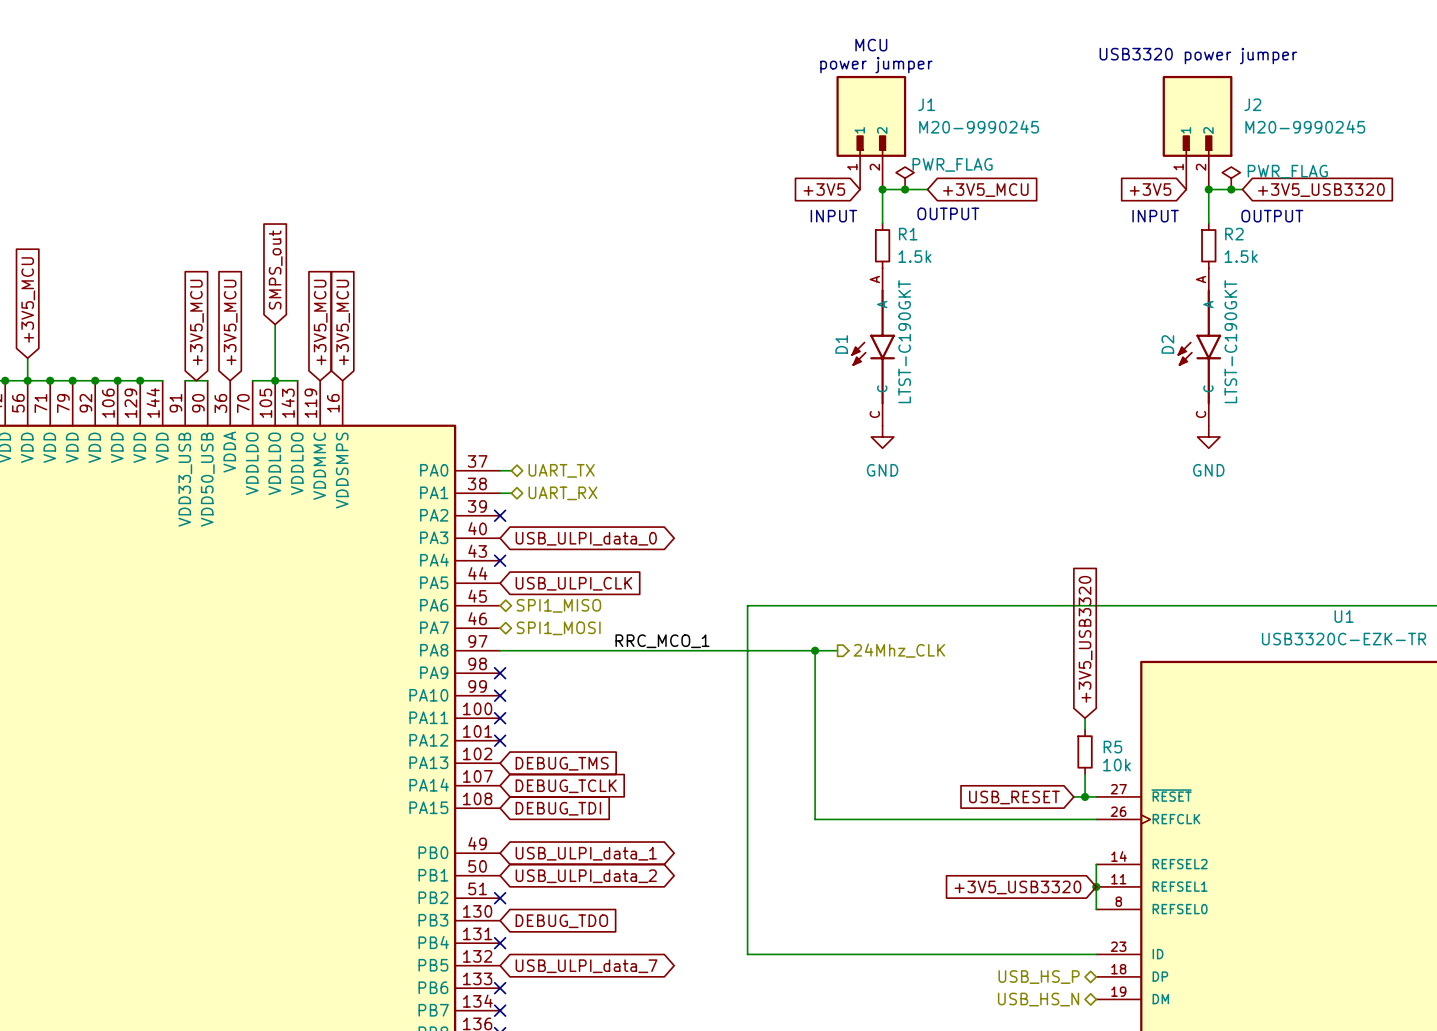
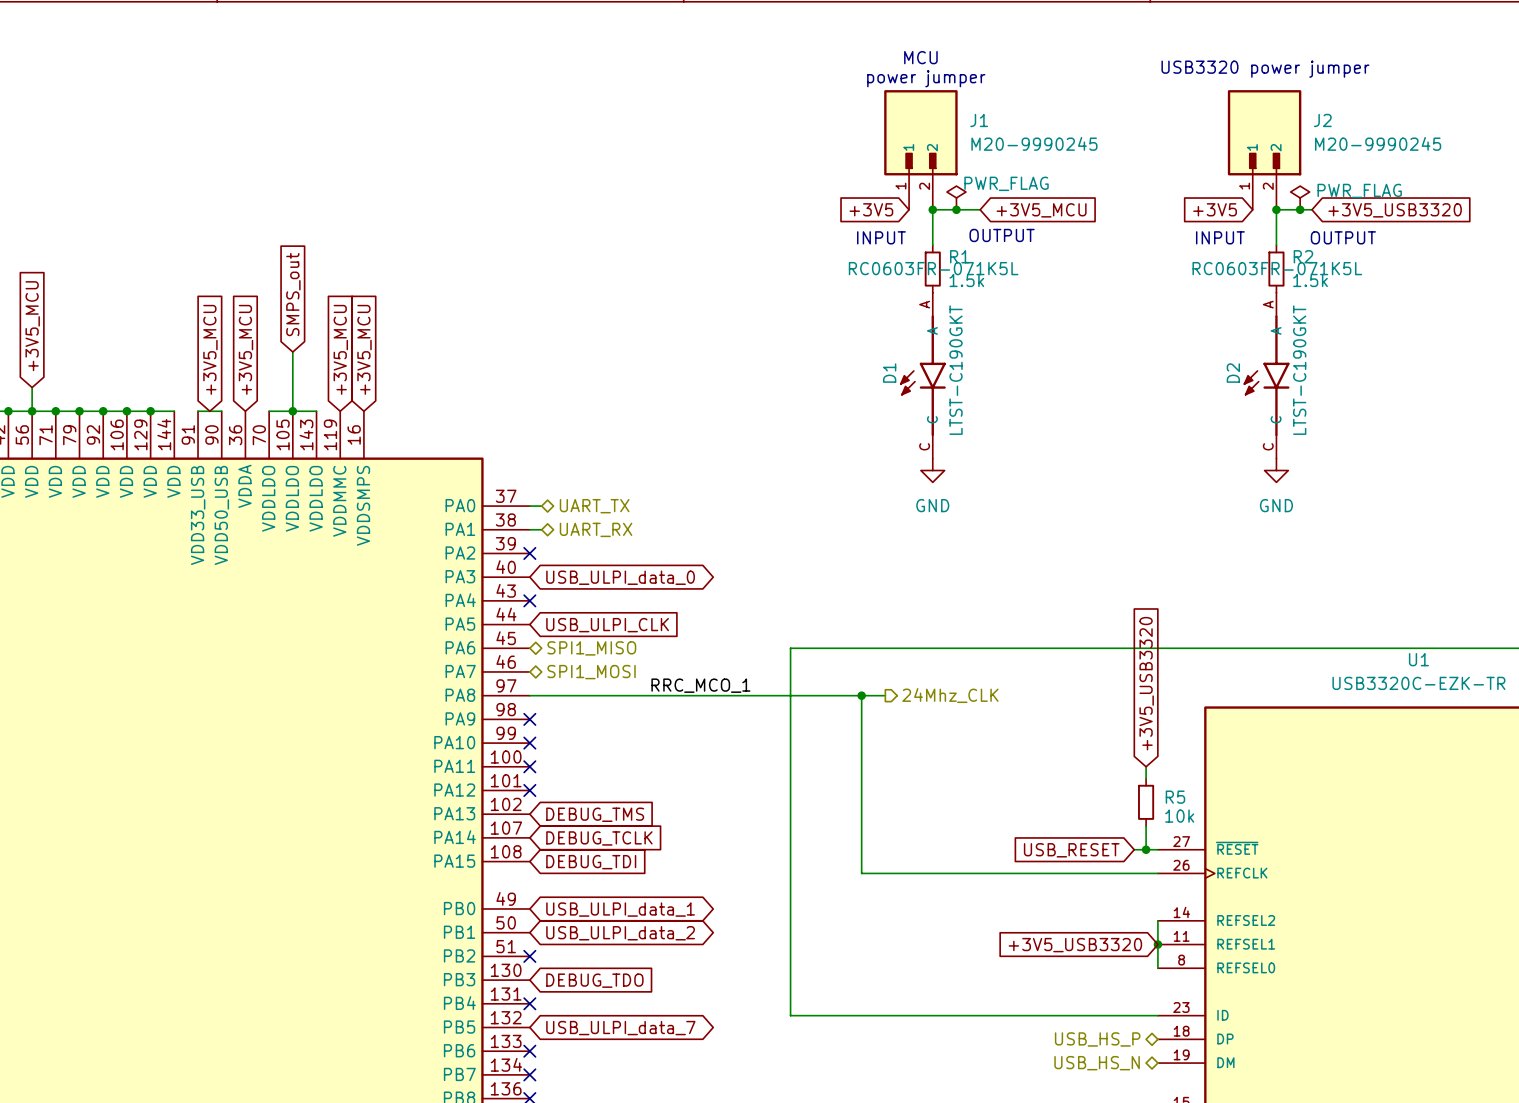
R1 text: none -> RC0603FR-071K5L (933, 268)
R2 text: none -> RC0603FR-071K5L (1277, 268)

